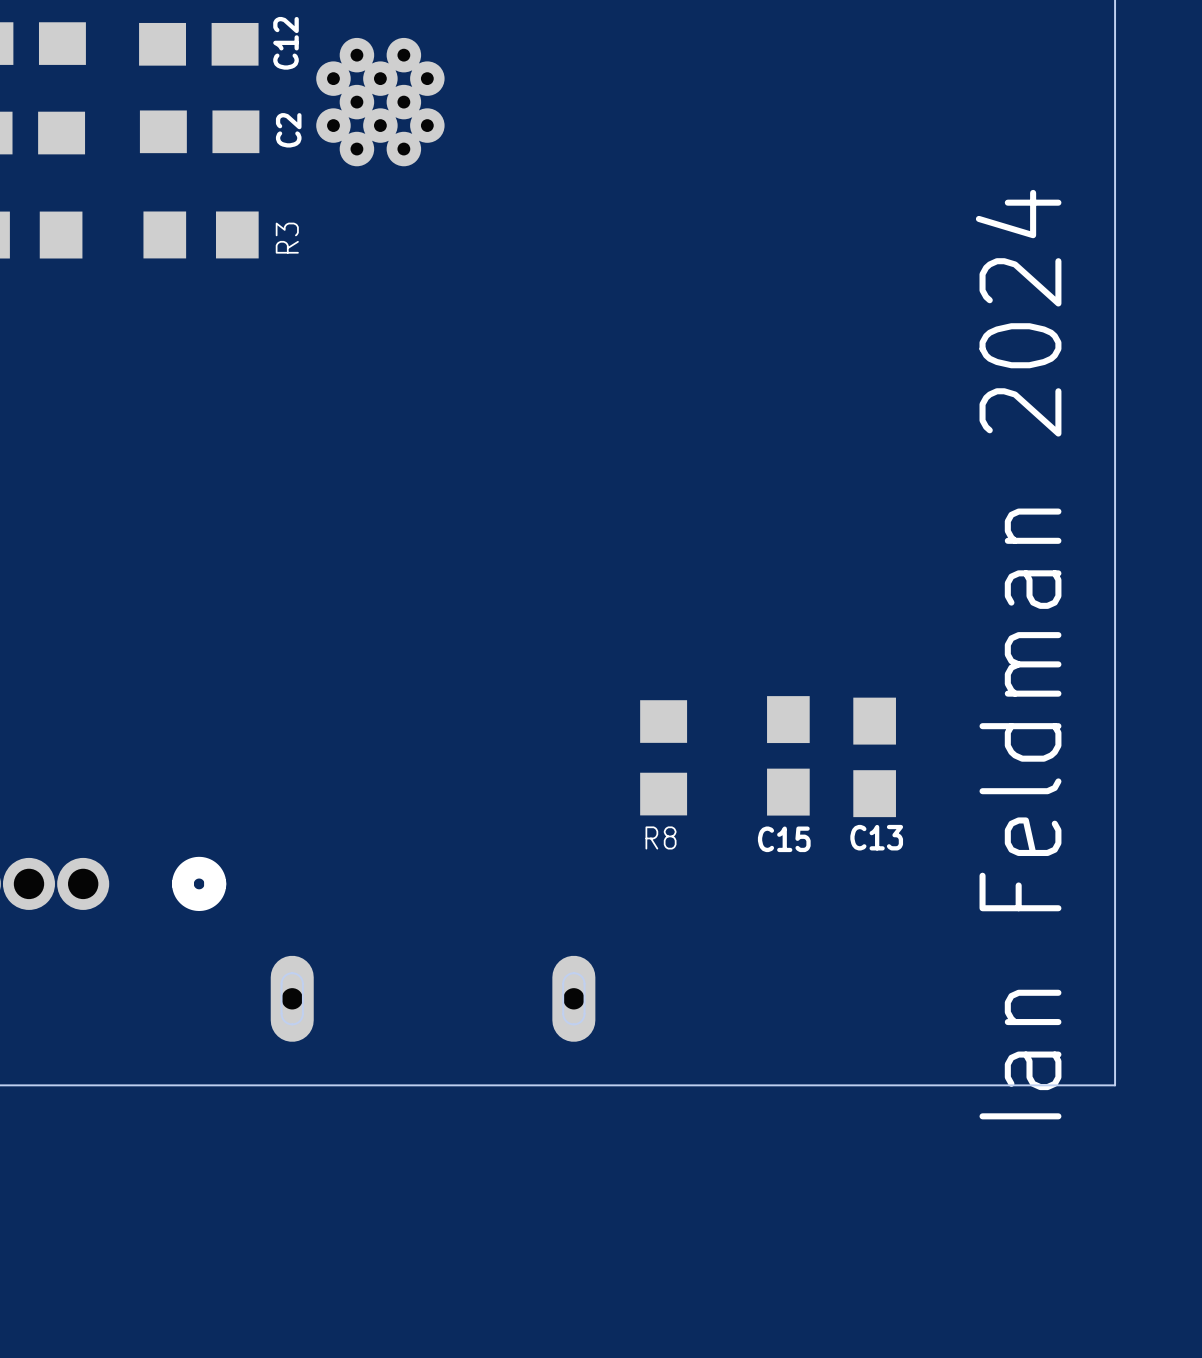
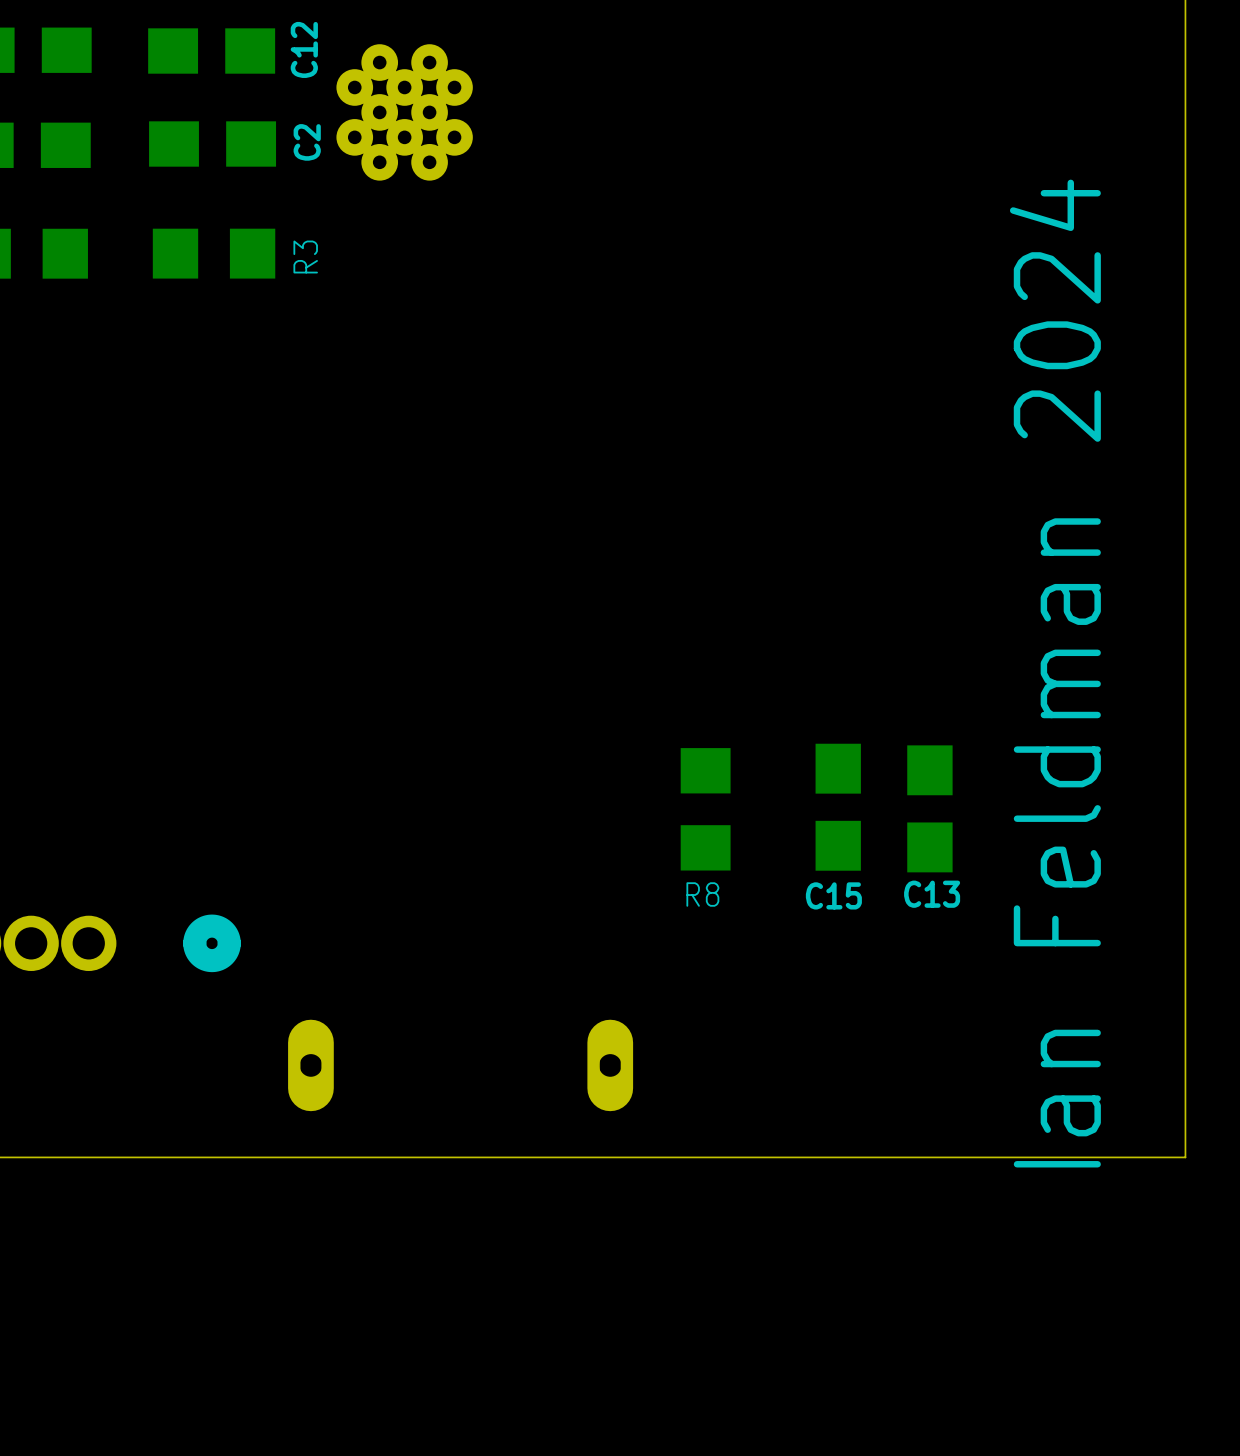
text position: Ian Feldman 2024 (1018, 654) -> Ian Feldman 2024 (1055, 673)

